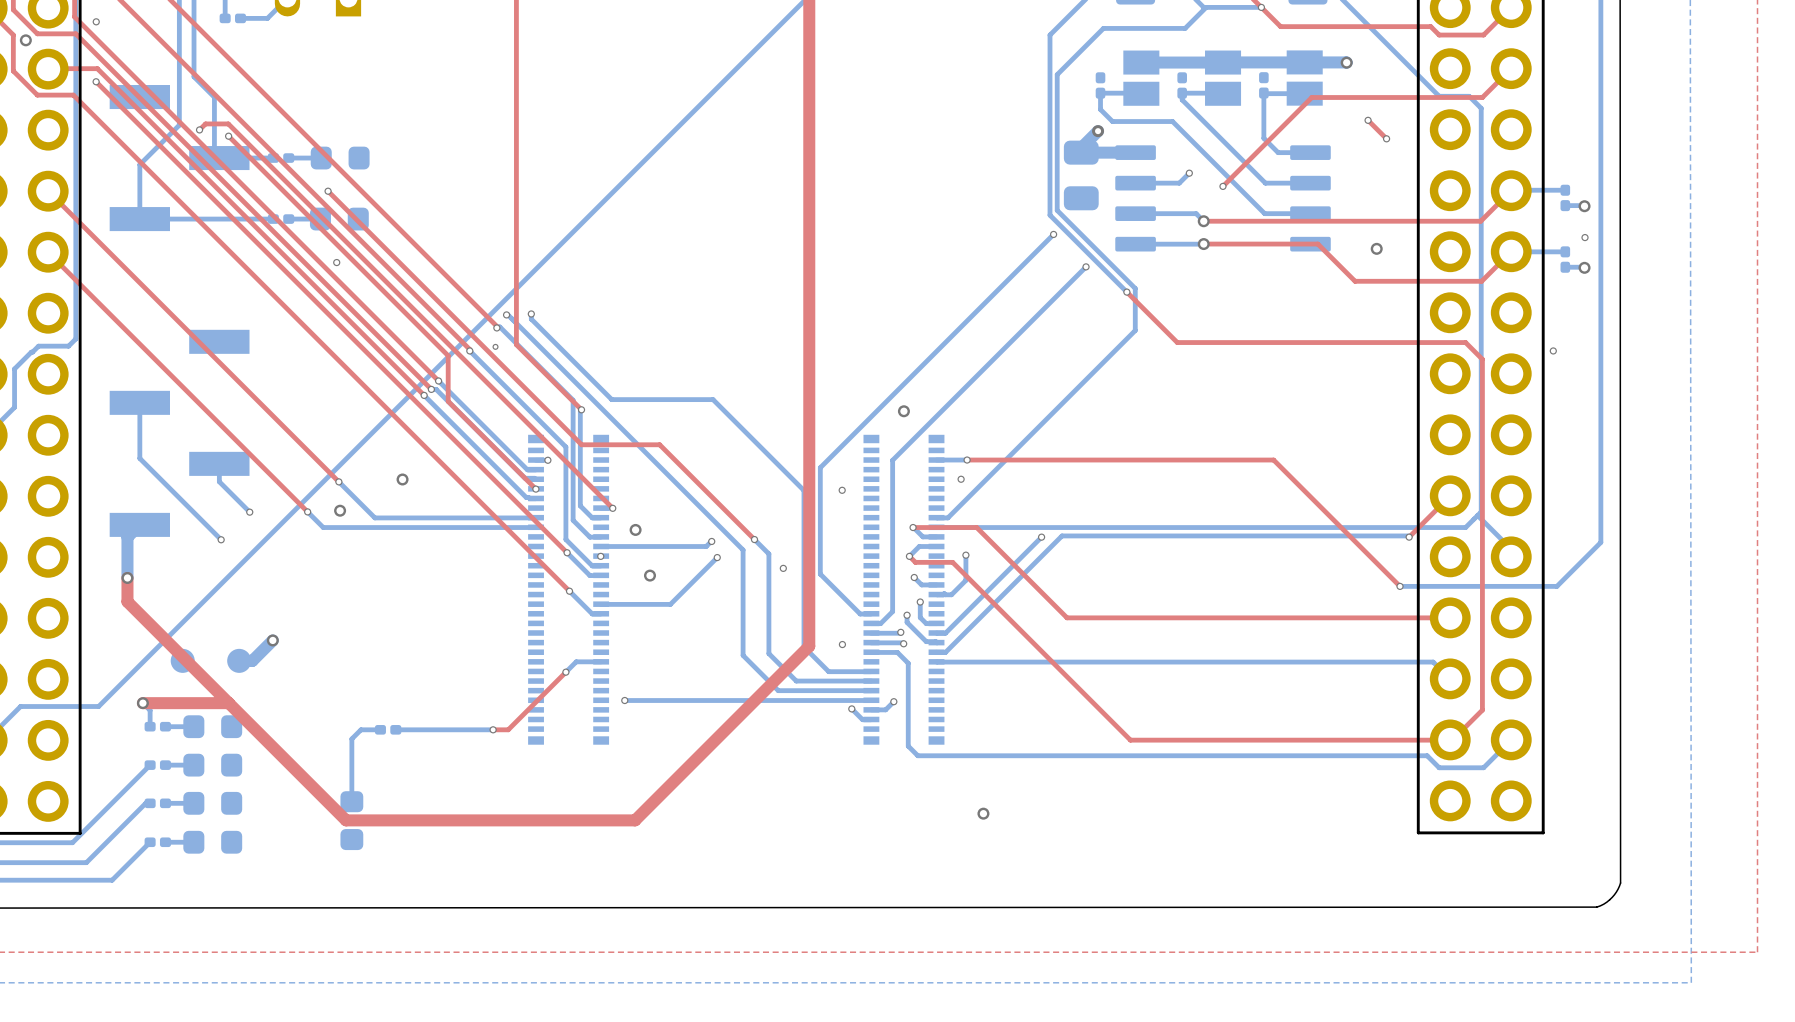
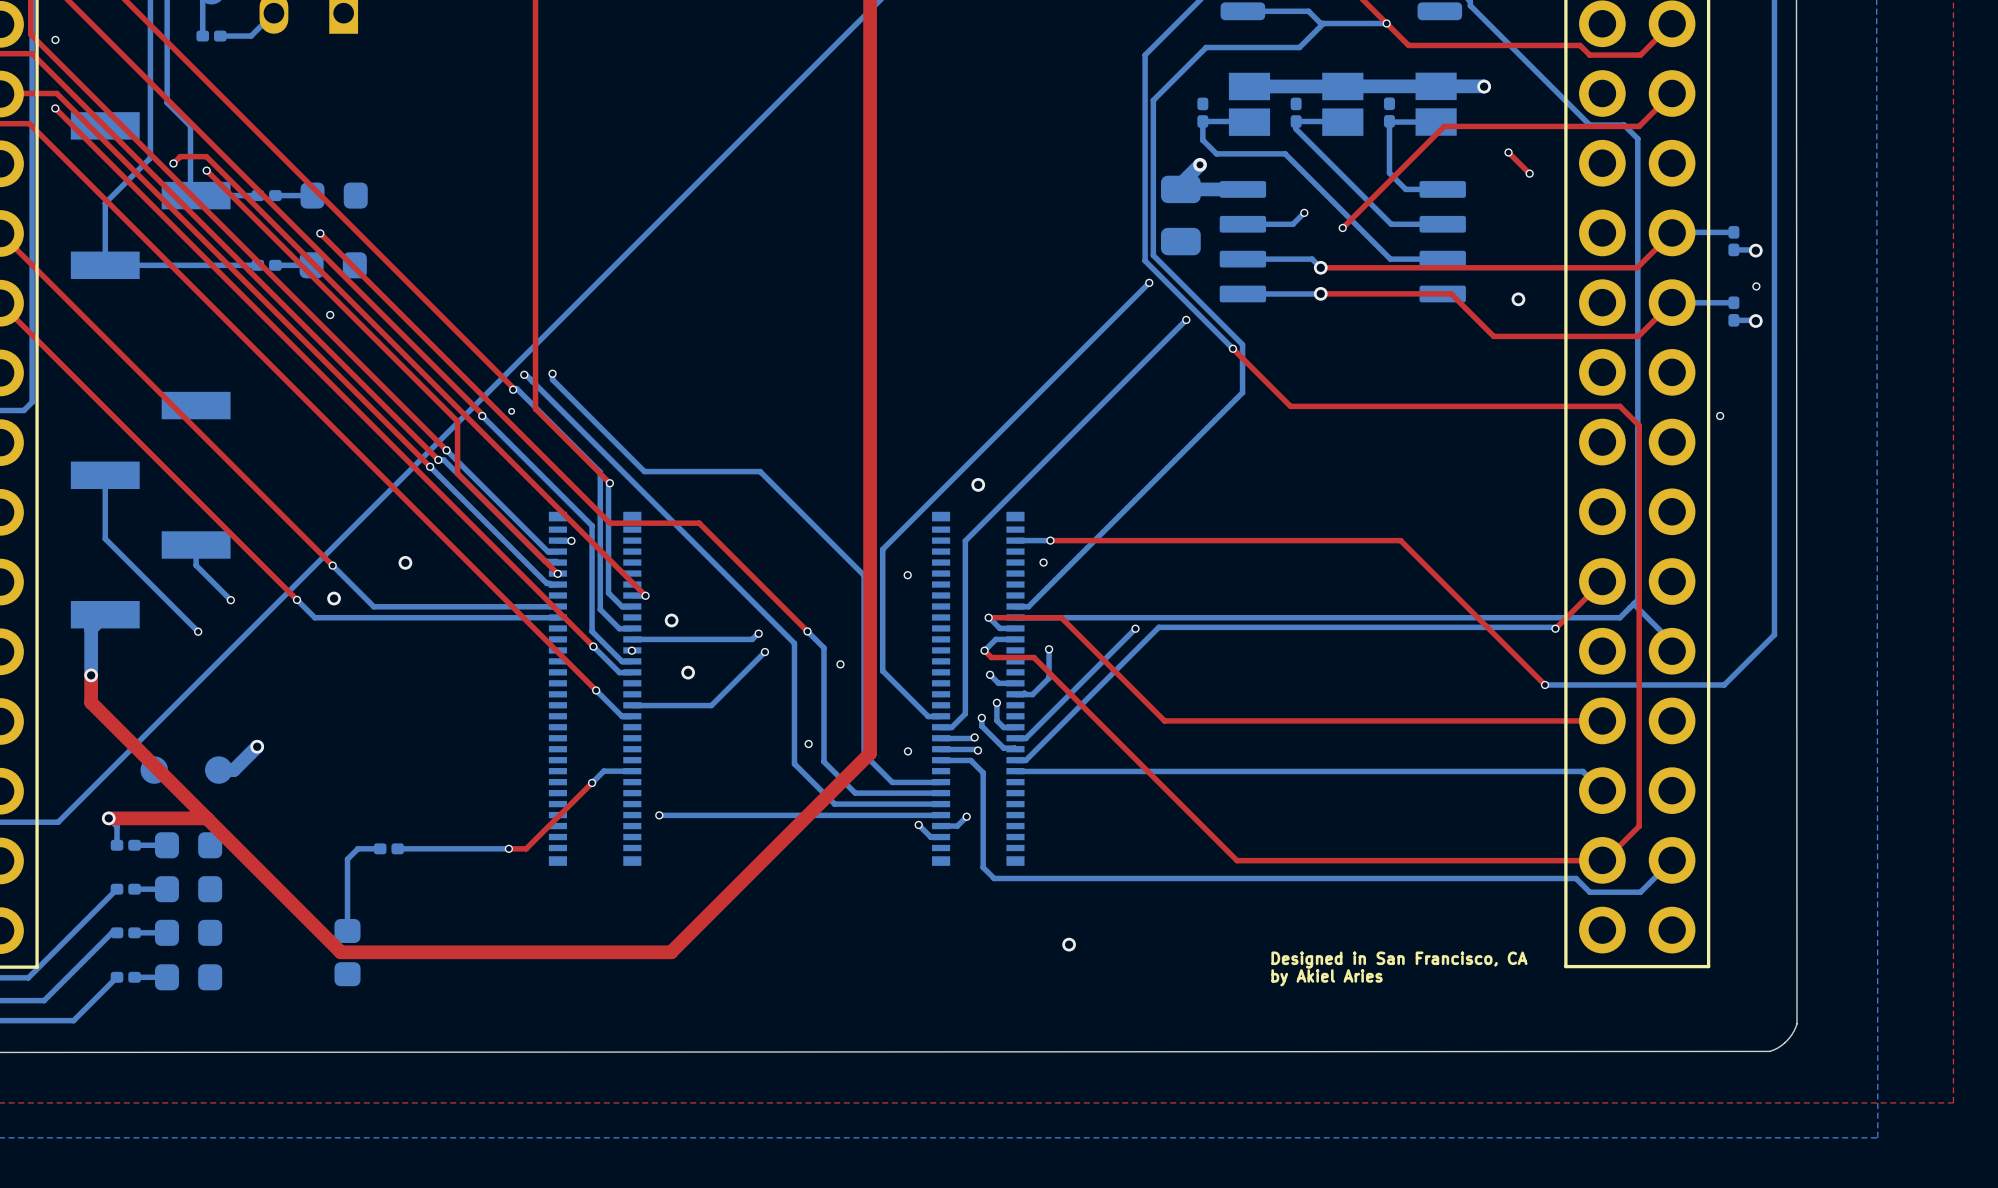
via: none -> (808, 743)
text: none -> Designed in San Francisco, CA (1399, 960)
text: none -> by Akiel Aries (1327, 977)

